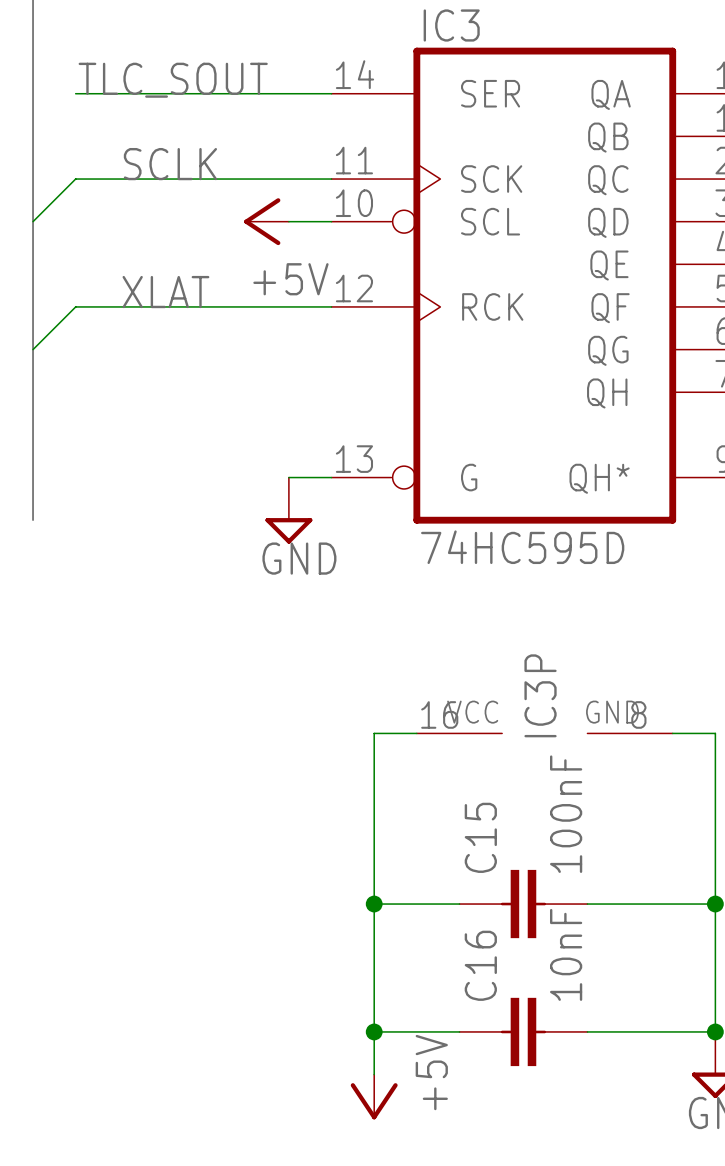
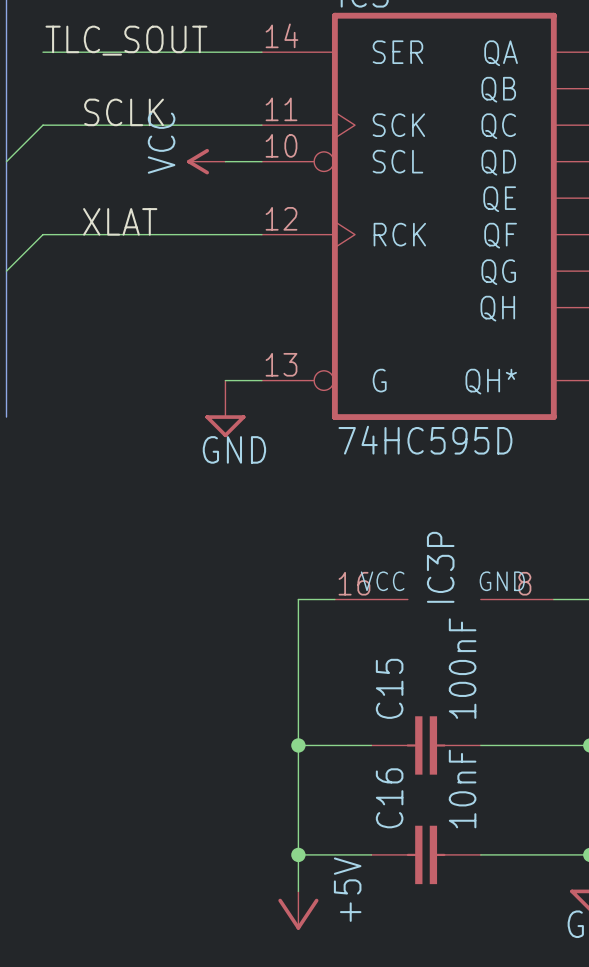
power symbol: +5V (266, 221) -> VCC (206, 161)

